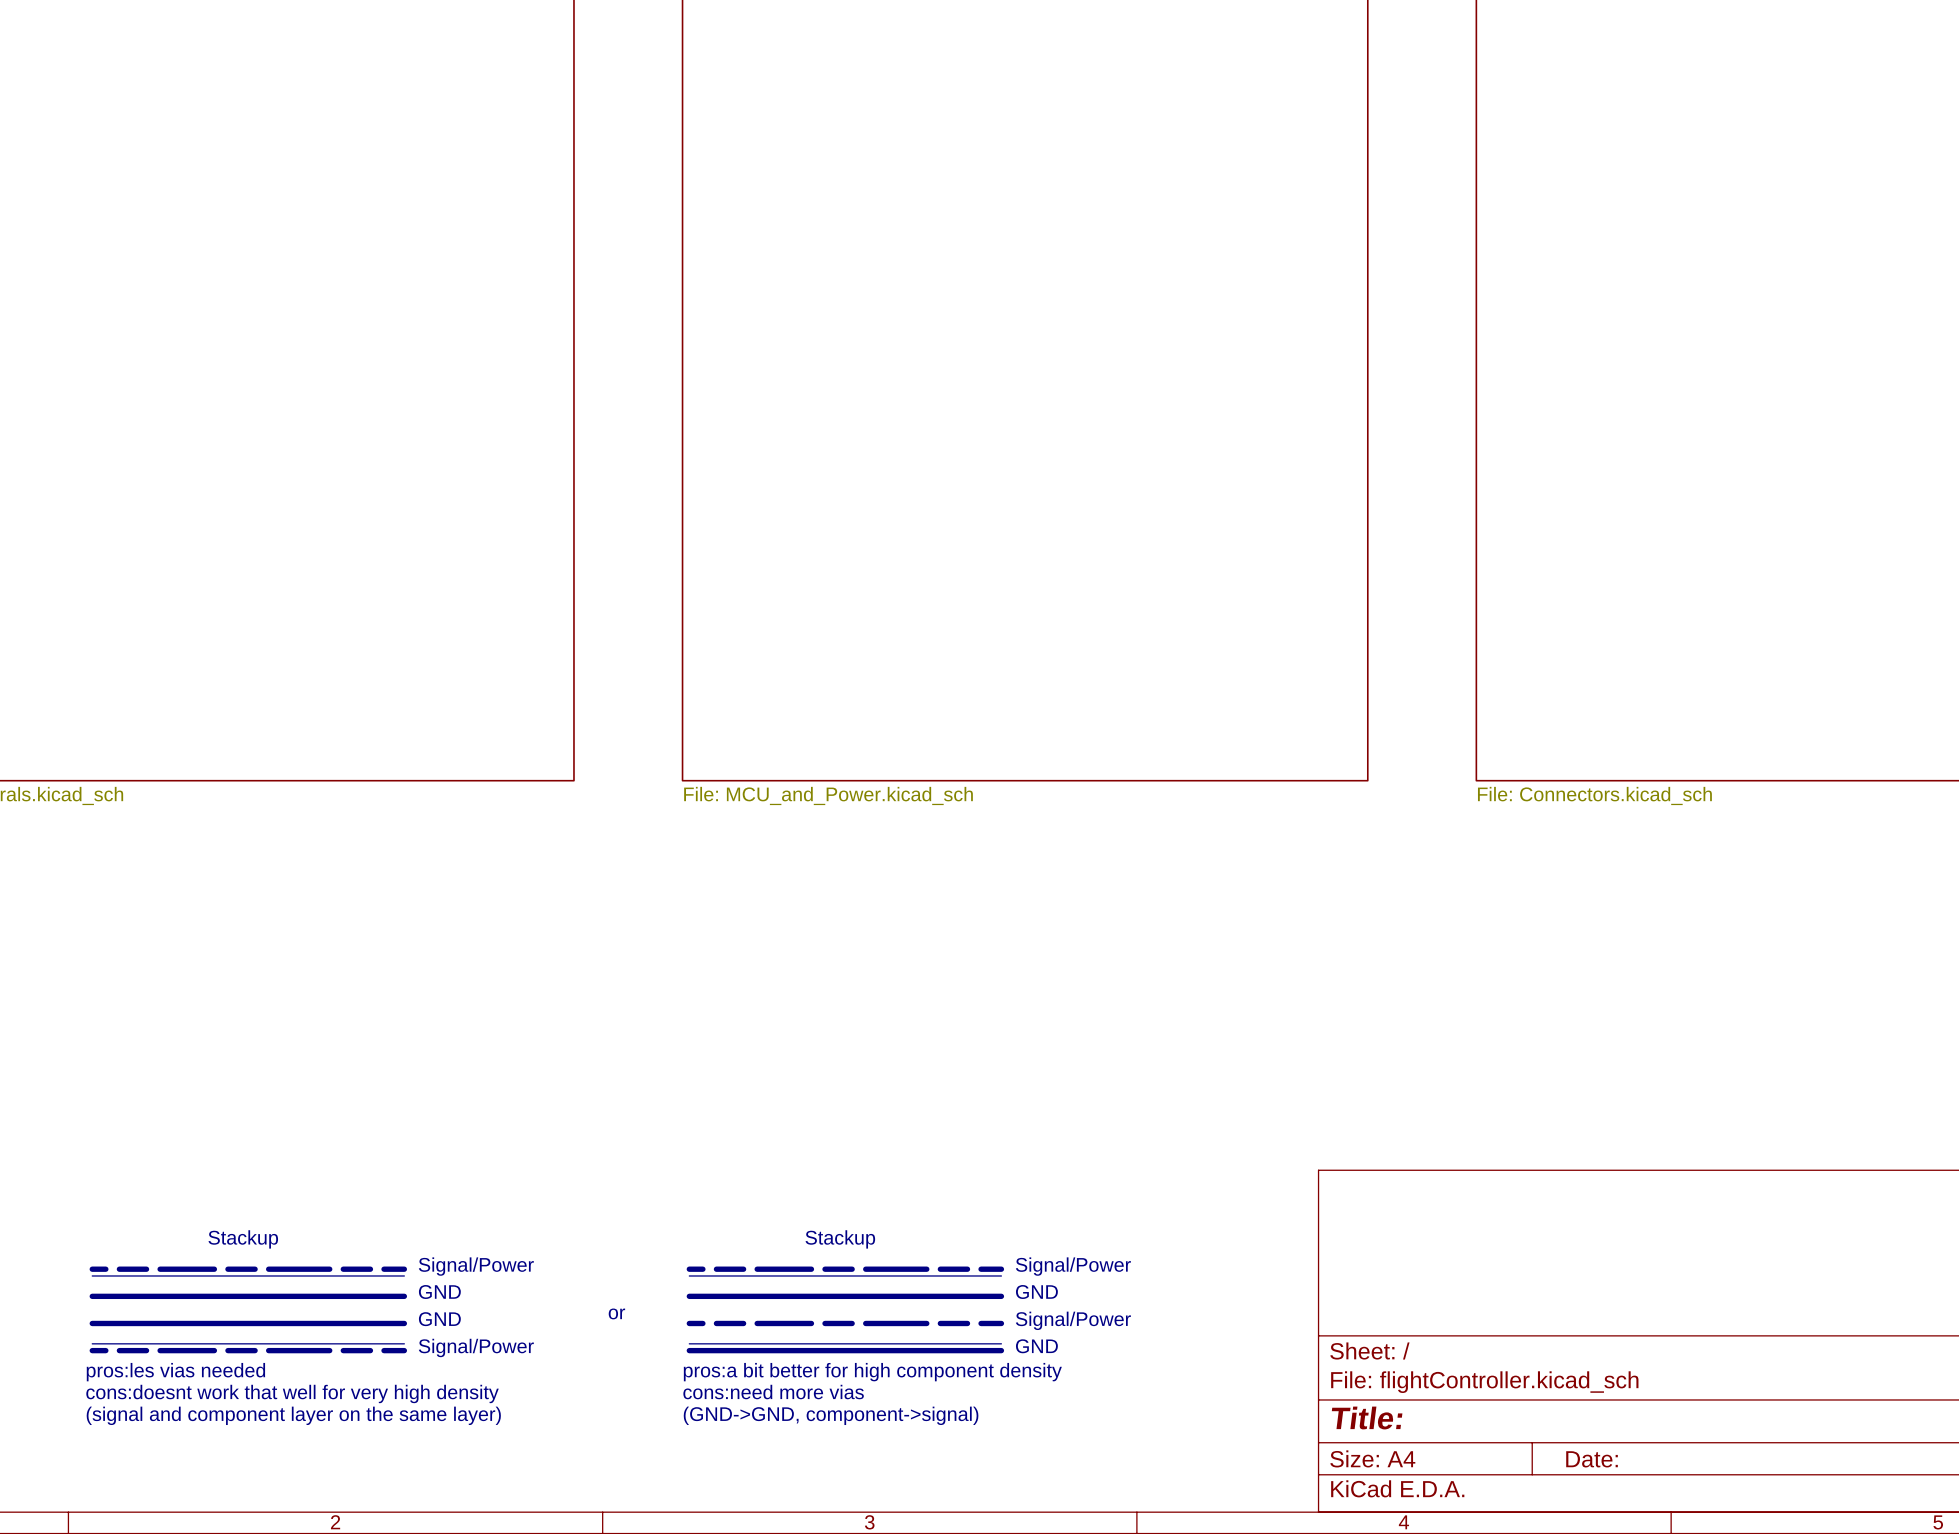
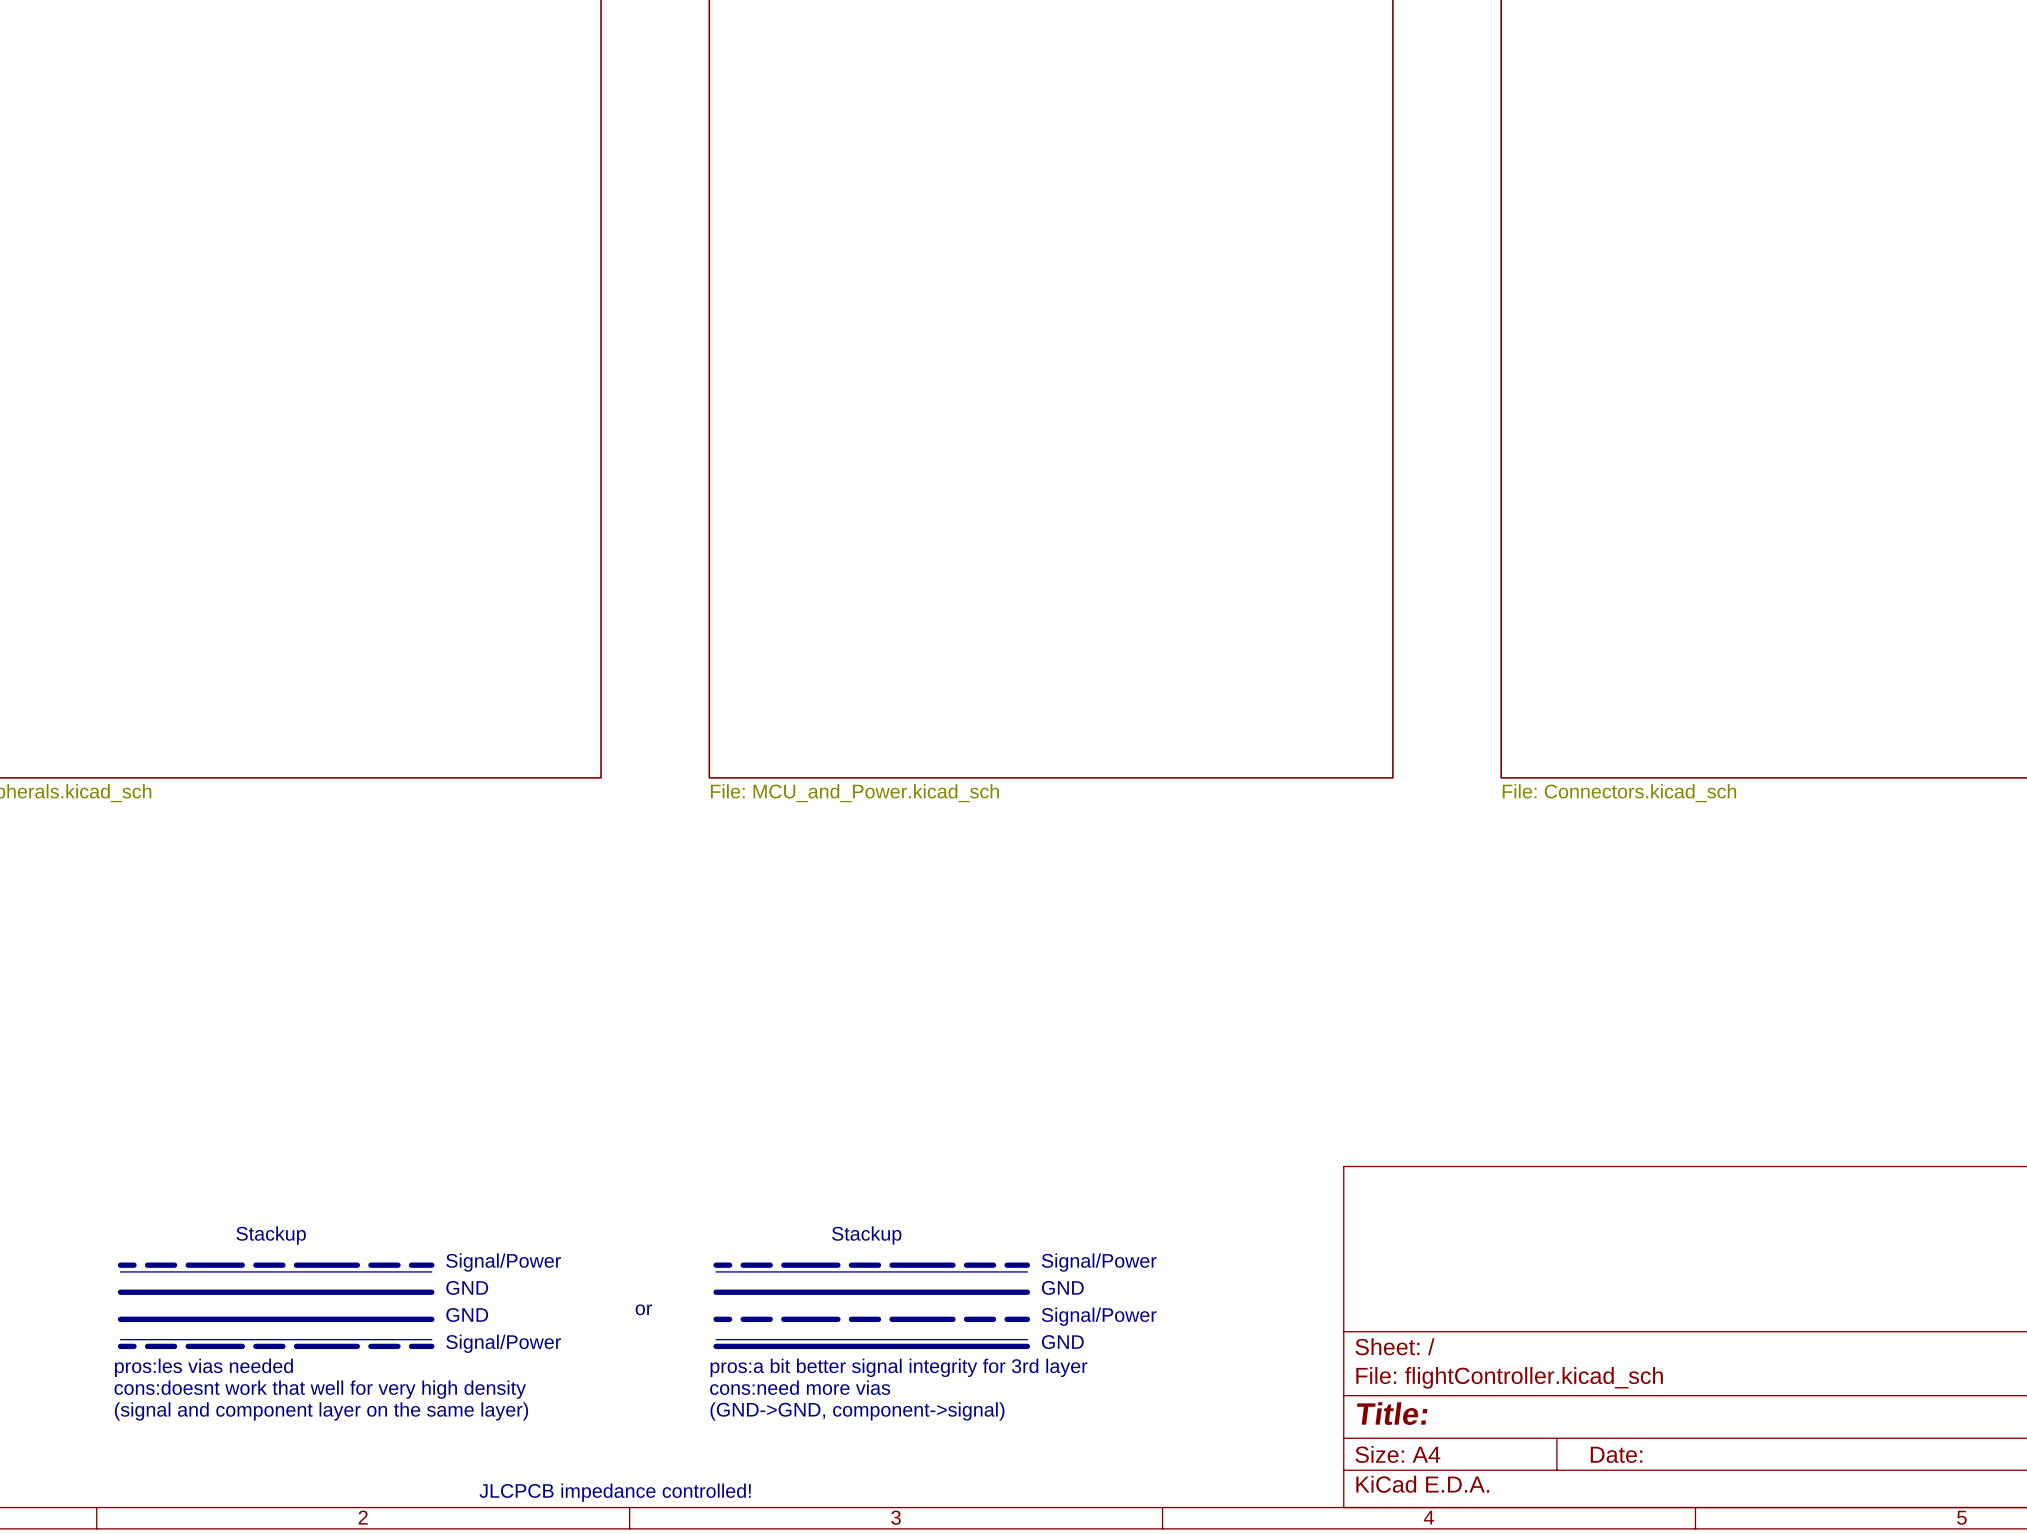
text: pros:a bit better for high component density (872, 1372) -> pros:a bit better signal integrity for 3rd layer (898, 1367)
text: none -> JLCPCB impedance controlled! (615, 1492)

